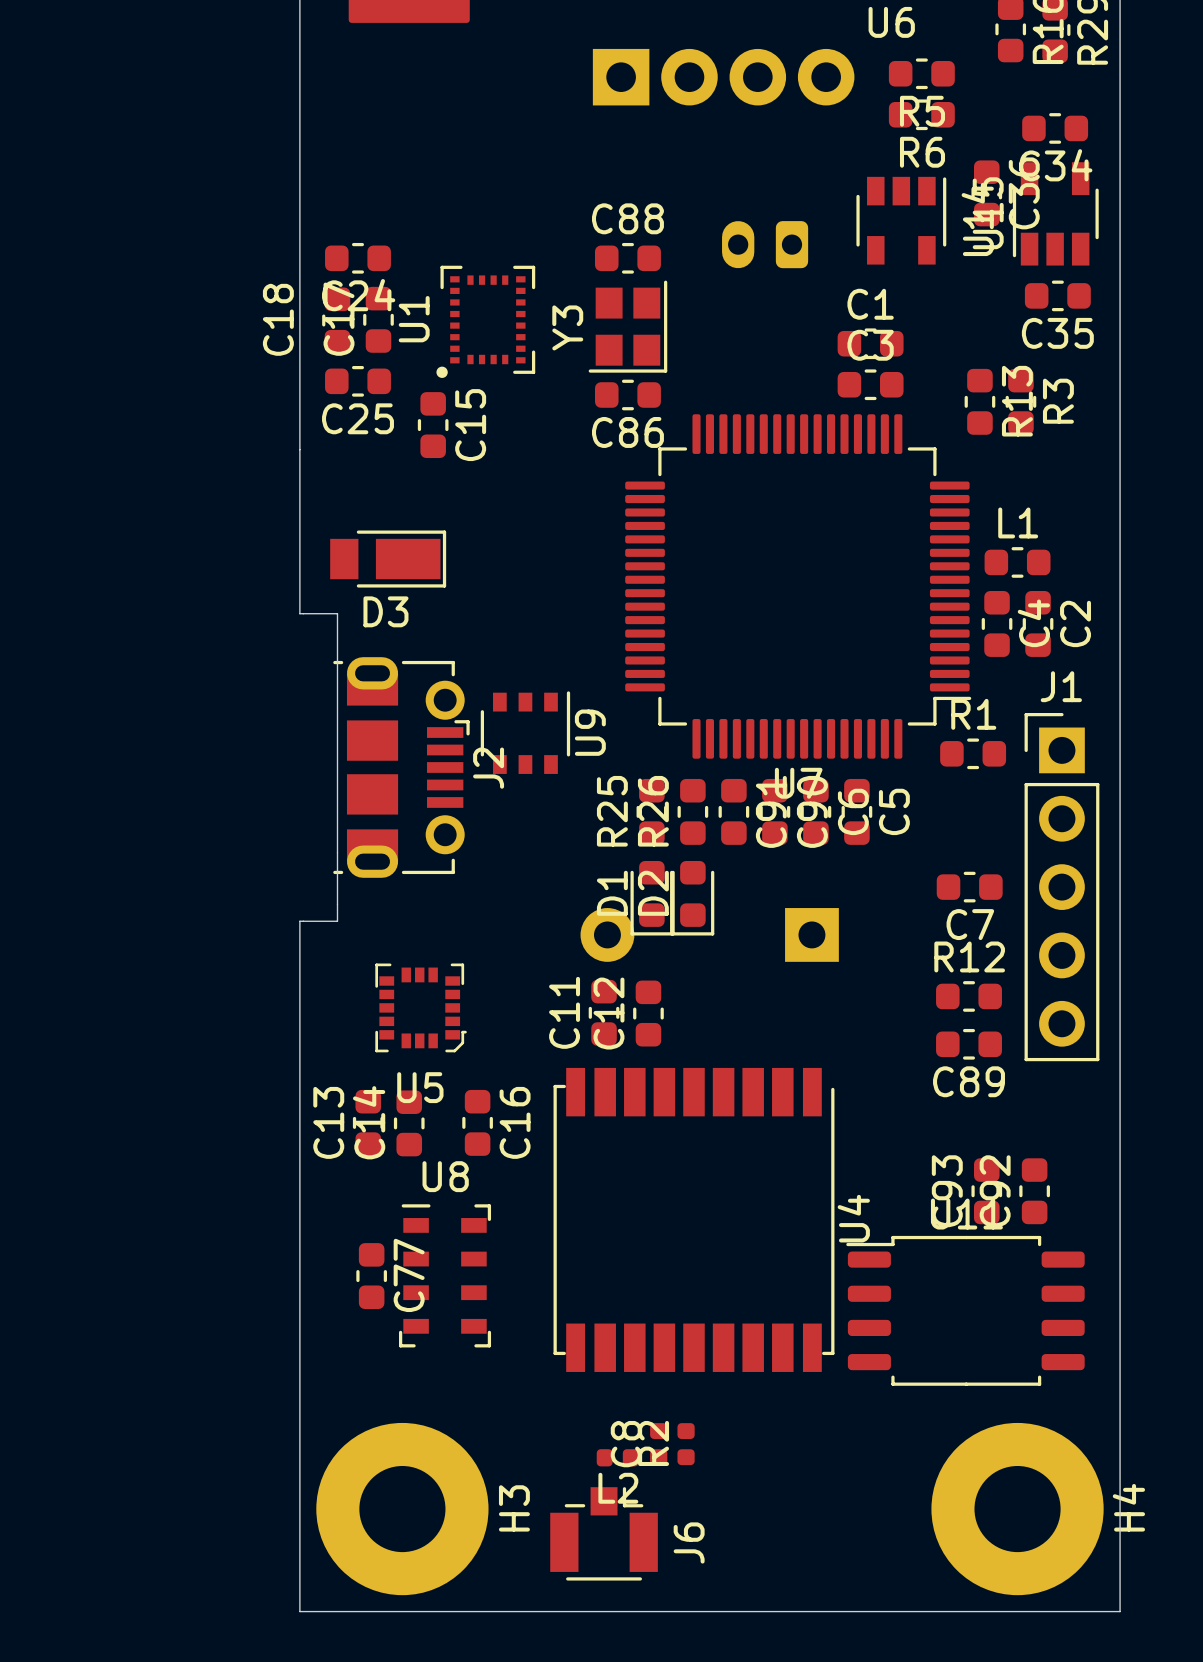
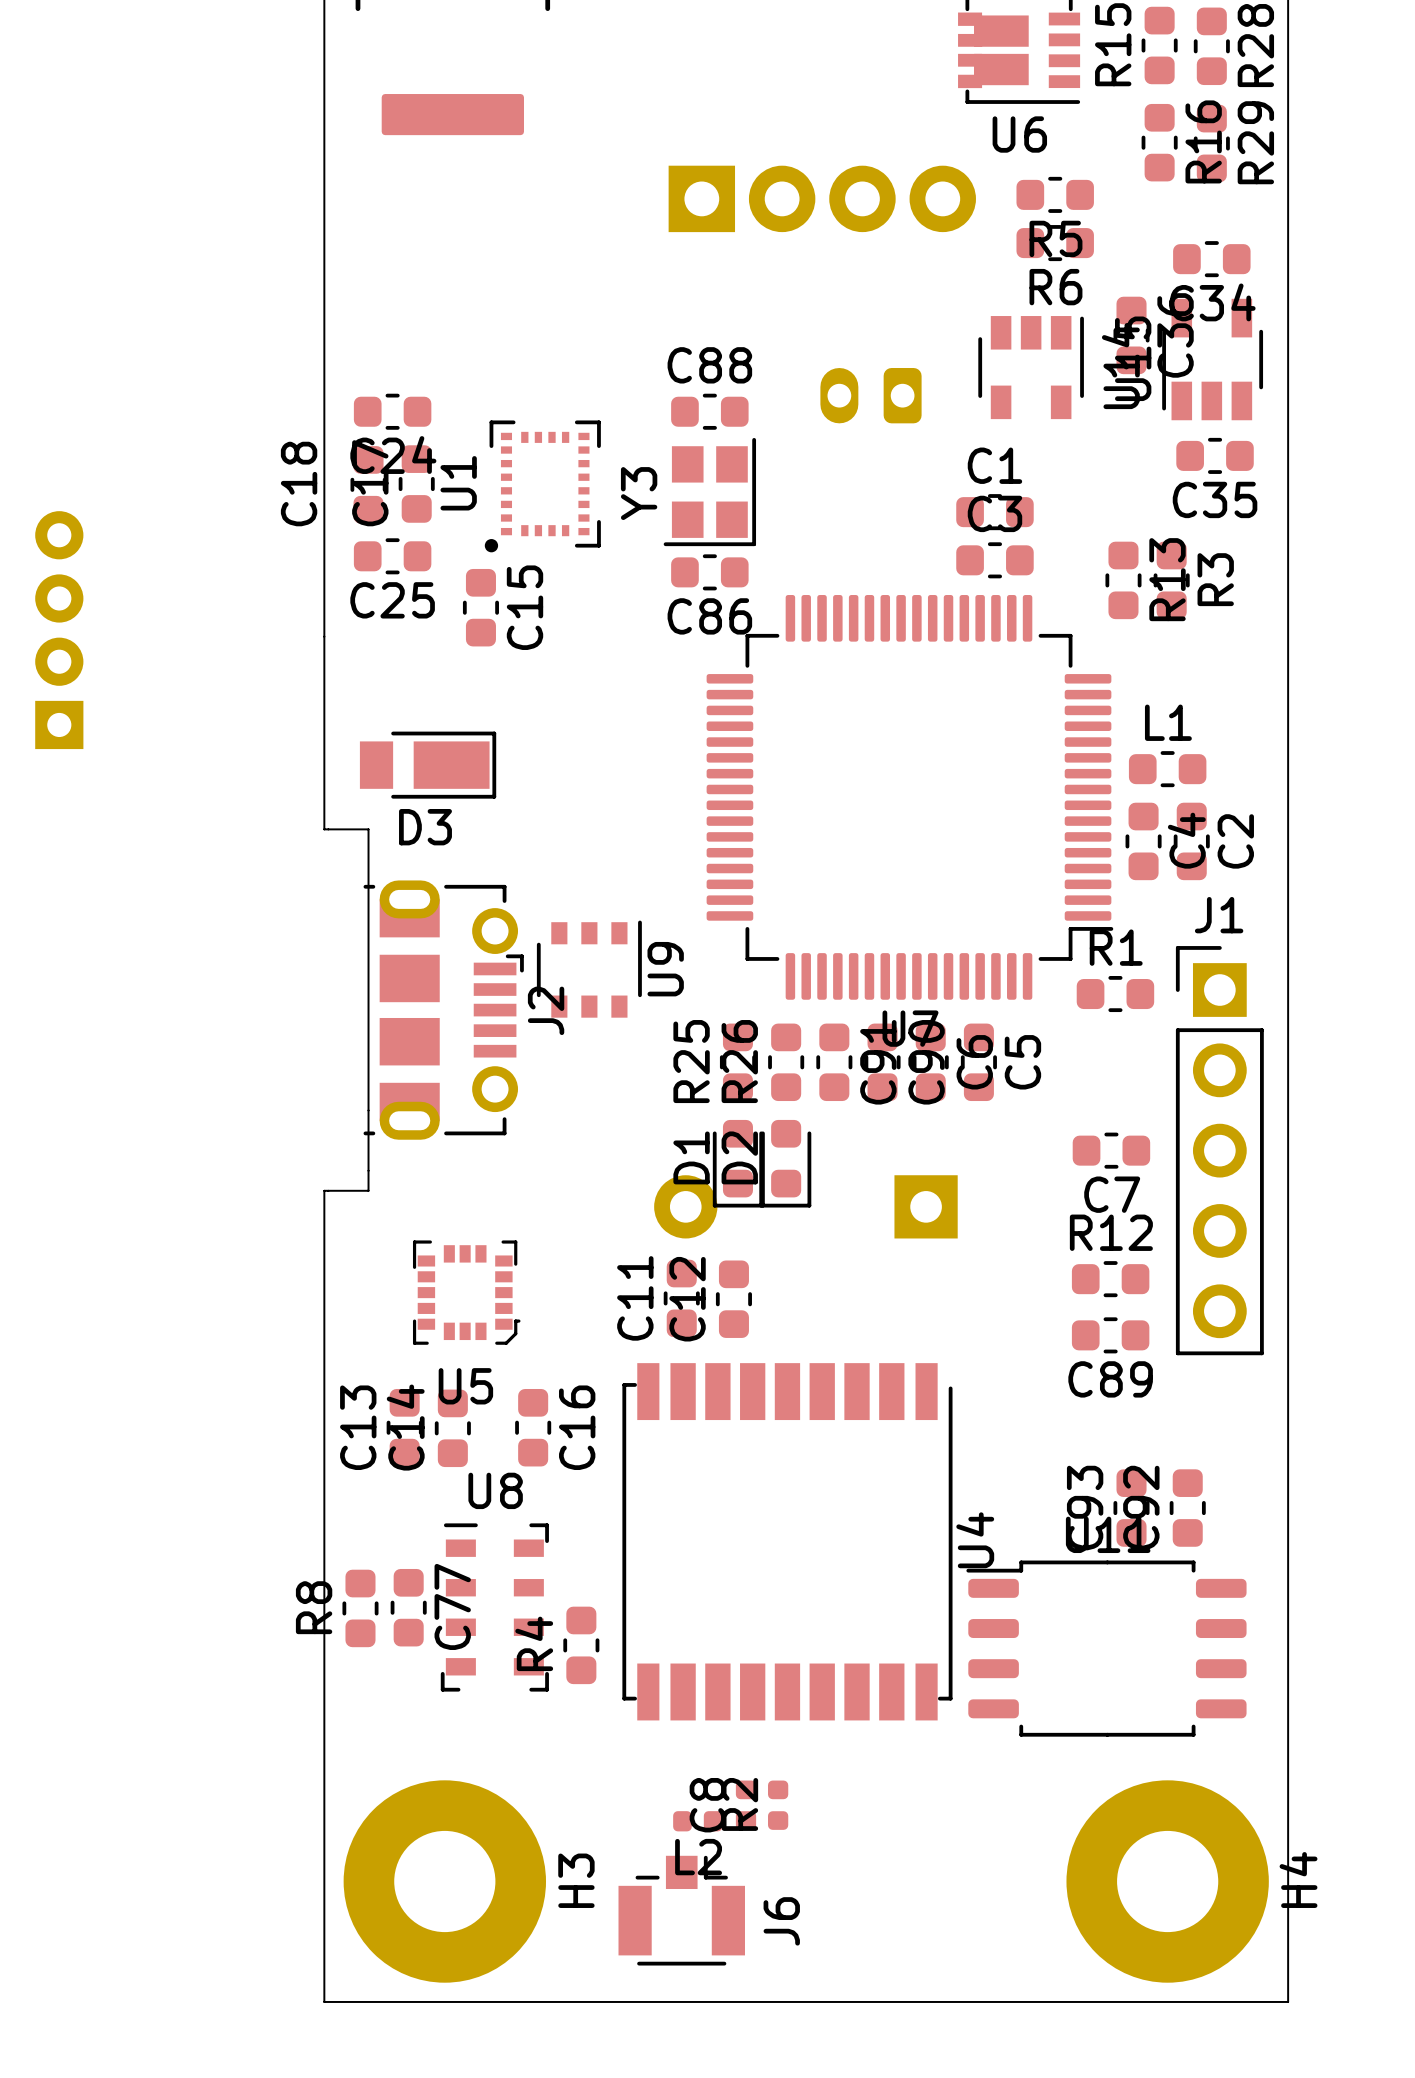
part: none -> (59, 630)
R8: none -> (360, 1608)
R4: none -> (581, 1645)

